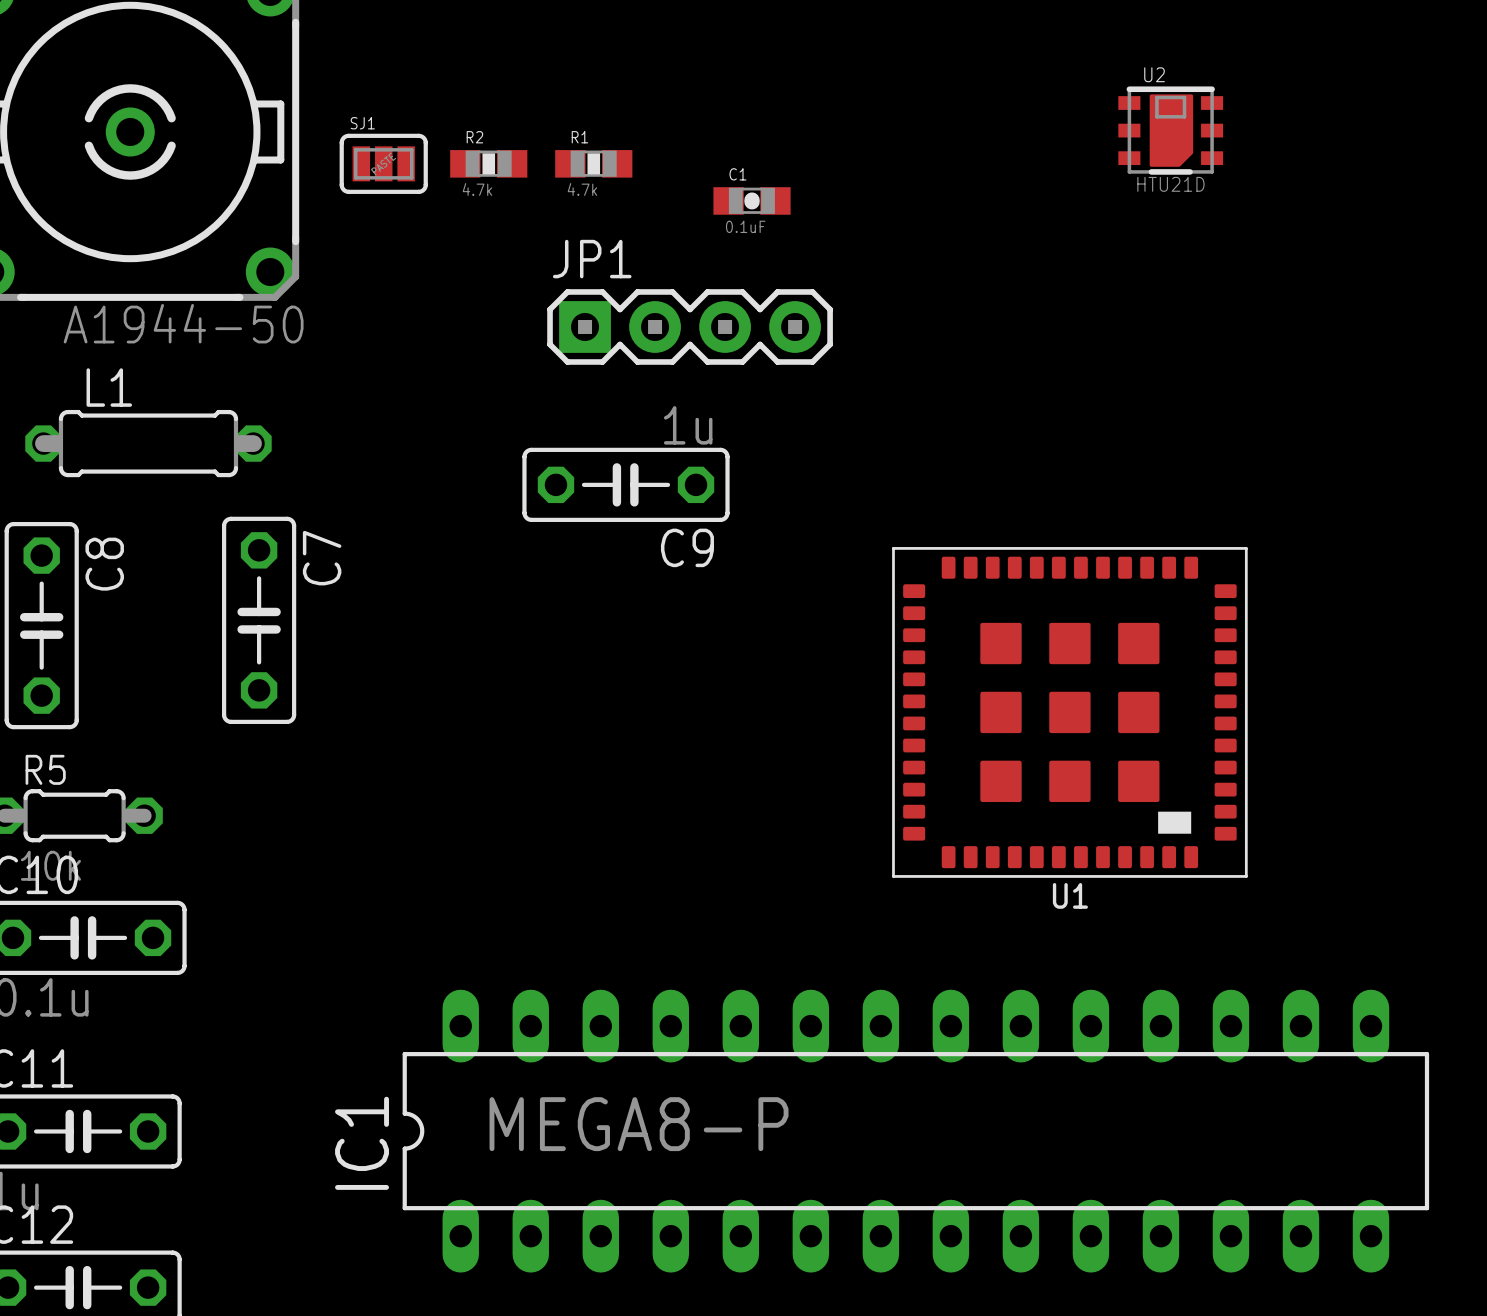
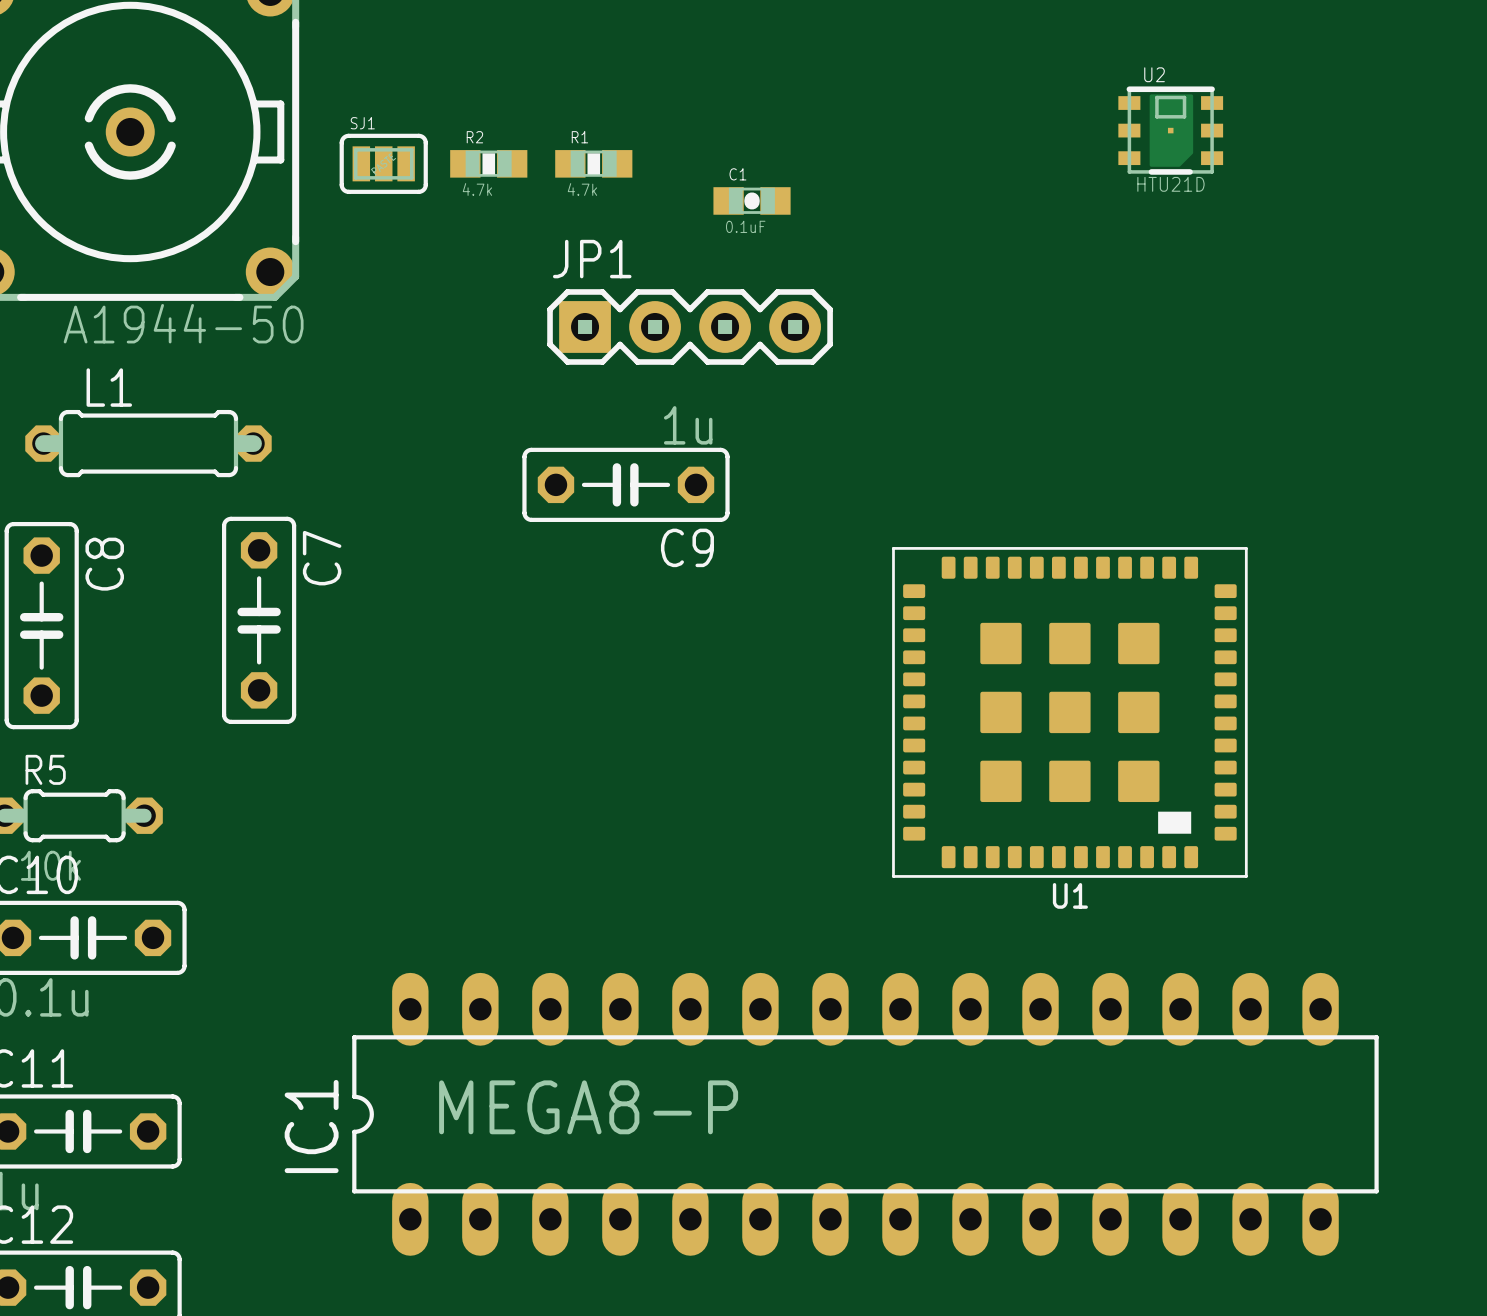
IC1 position: (915, 1131) -> (865, 1114)

